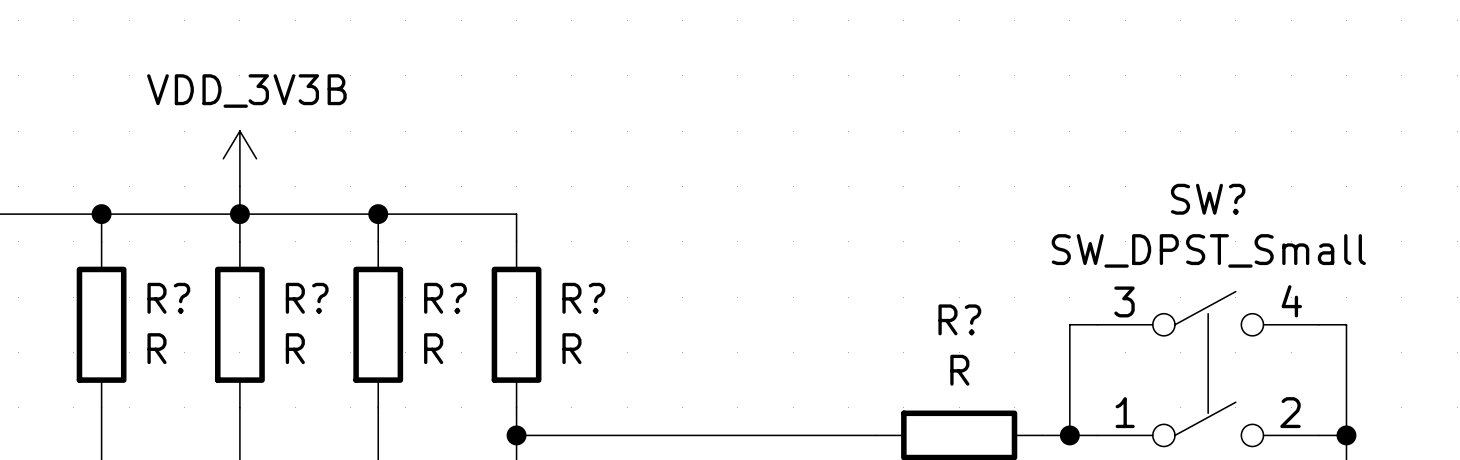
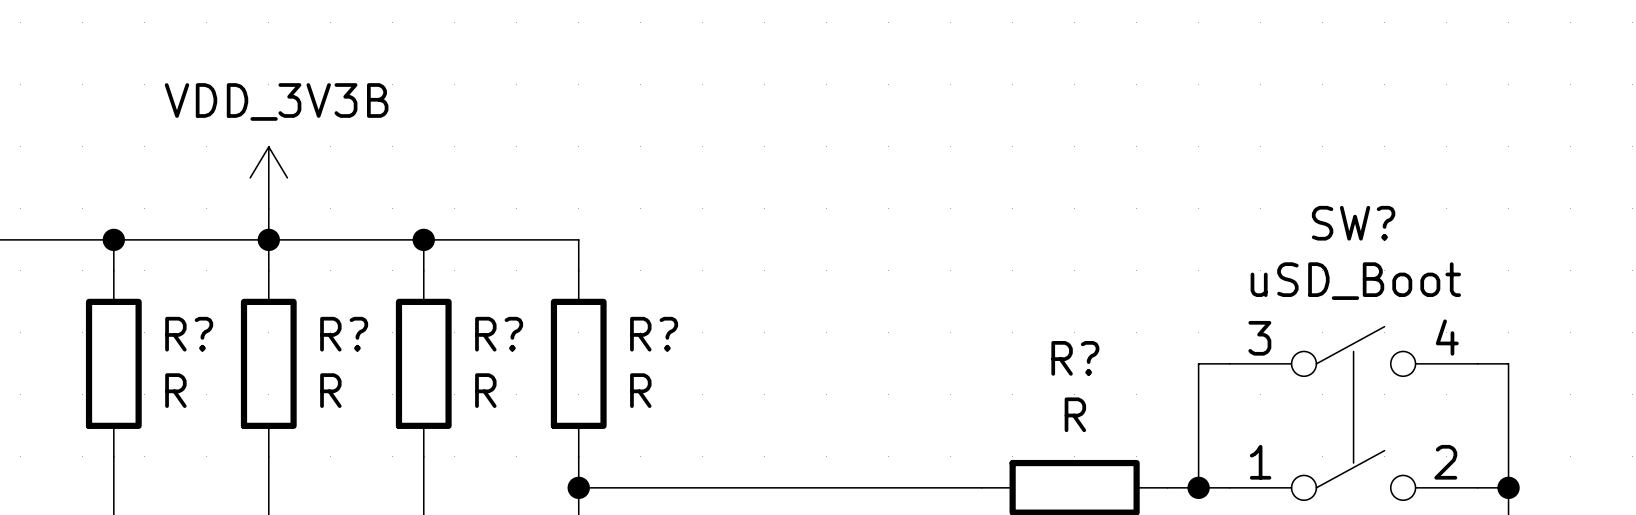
SW? value: SW_DPST_Small (1208, 250) -> uSD_Boot (1355, 281)

